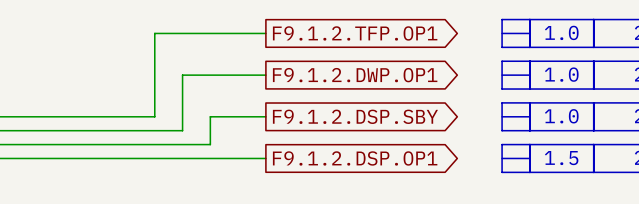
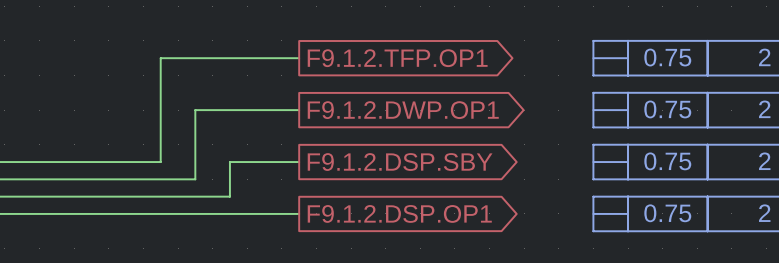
text: 1.0 (561, 32) -> 0.75 (667, 57)
text: 1.0 (561, 74) -> 0.75 (667, 109)
text: 1.0 (561, 116) -> 0.75 (667, 161)
text: 1.5 (561, 158) -> 0.75 (667, 213)

